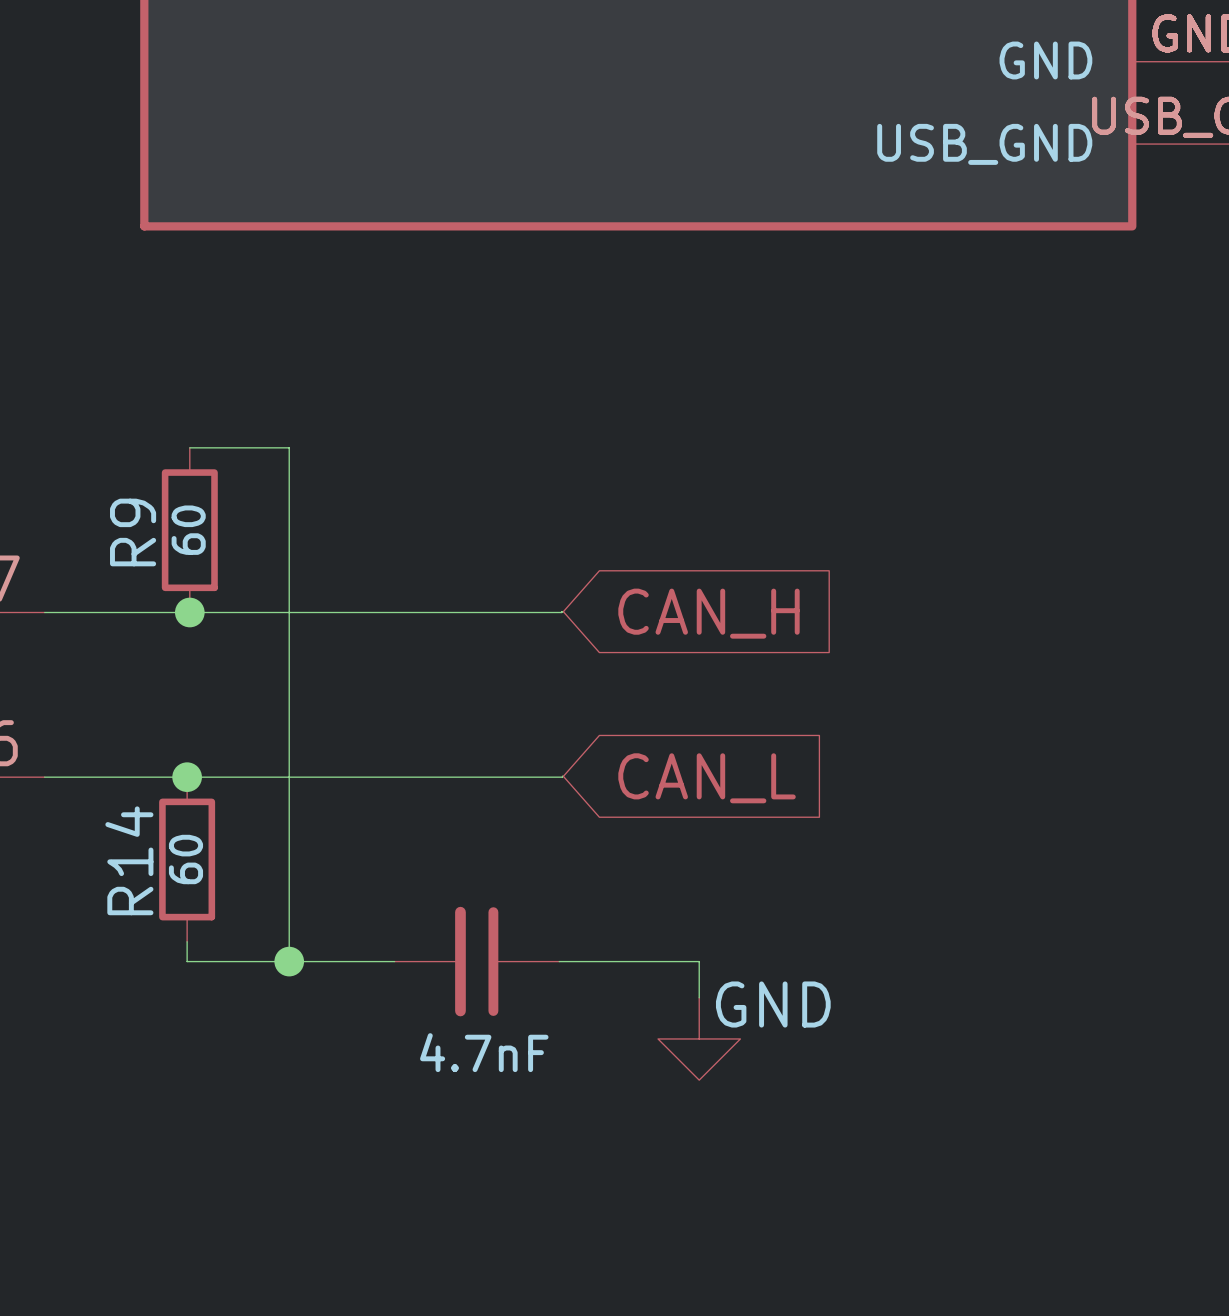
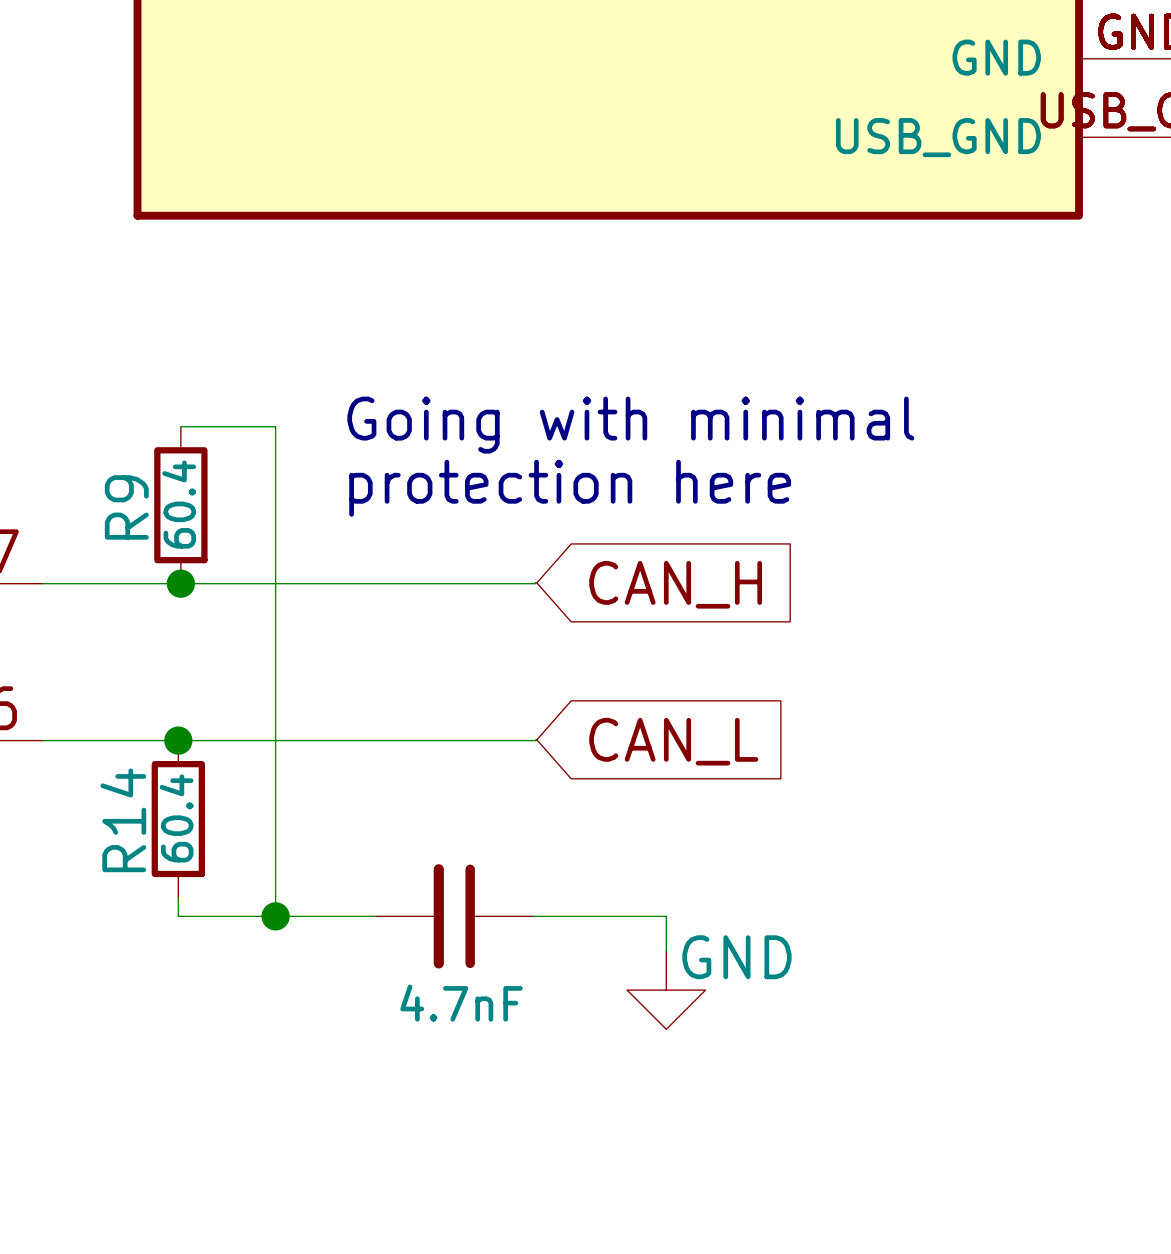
text: none -> Going with minimal (630, 425)
text: none -> protection here (570, 488)
R9 value: 60 (188, 530) -> 60.4 (179, 504)
R14 value: 60 (185, 859) -> 60.4 (176, 818)

